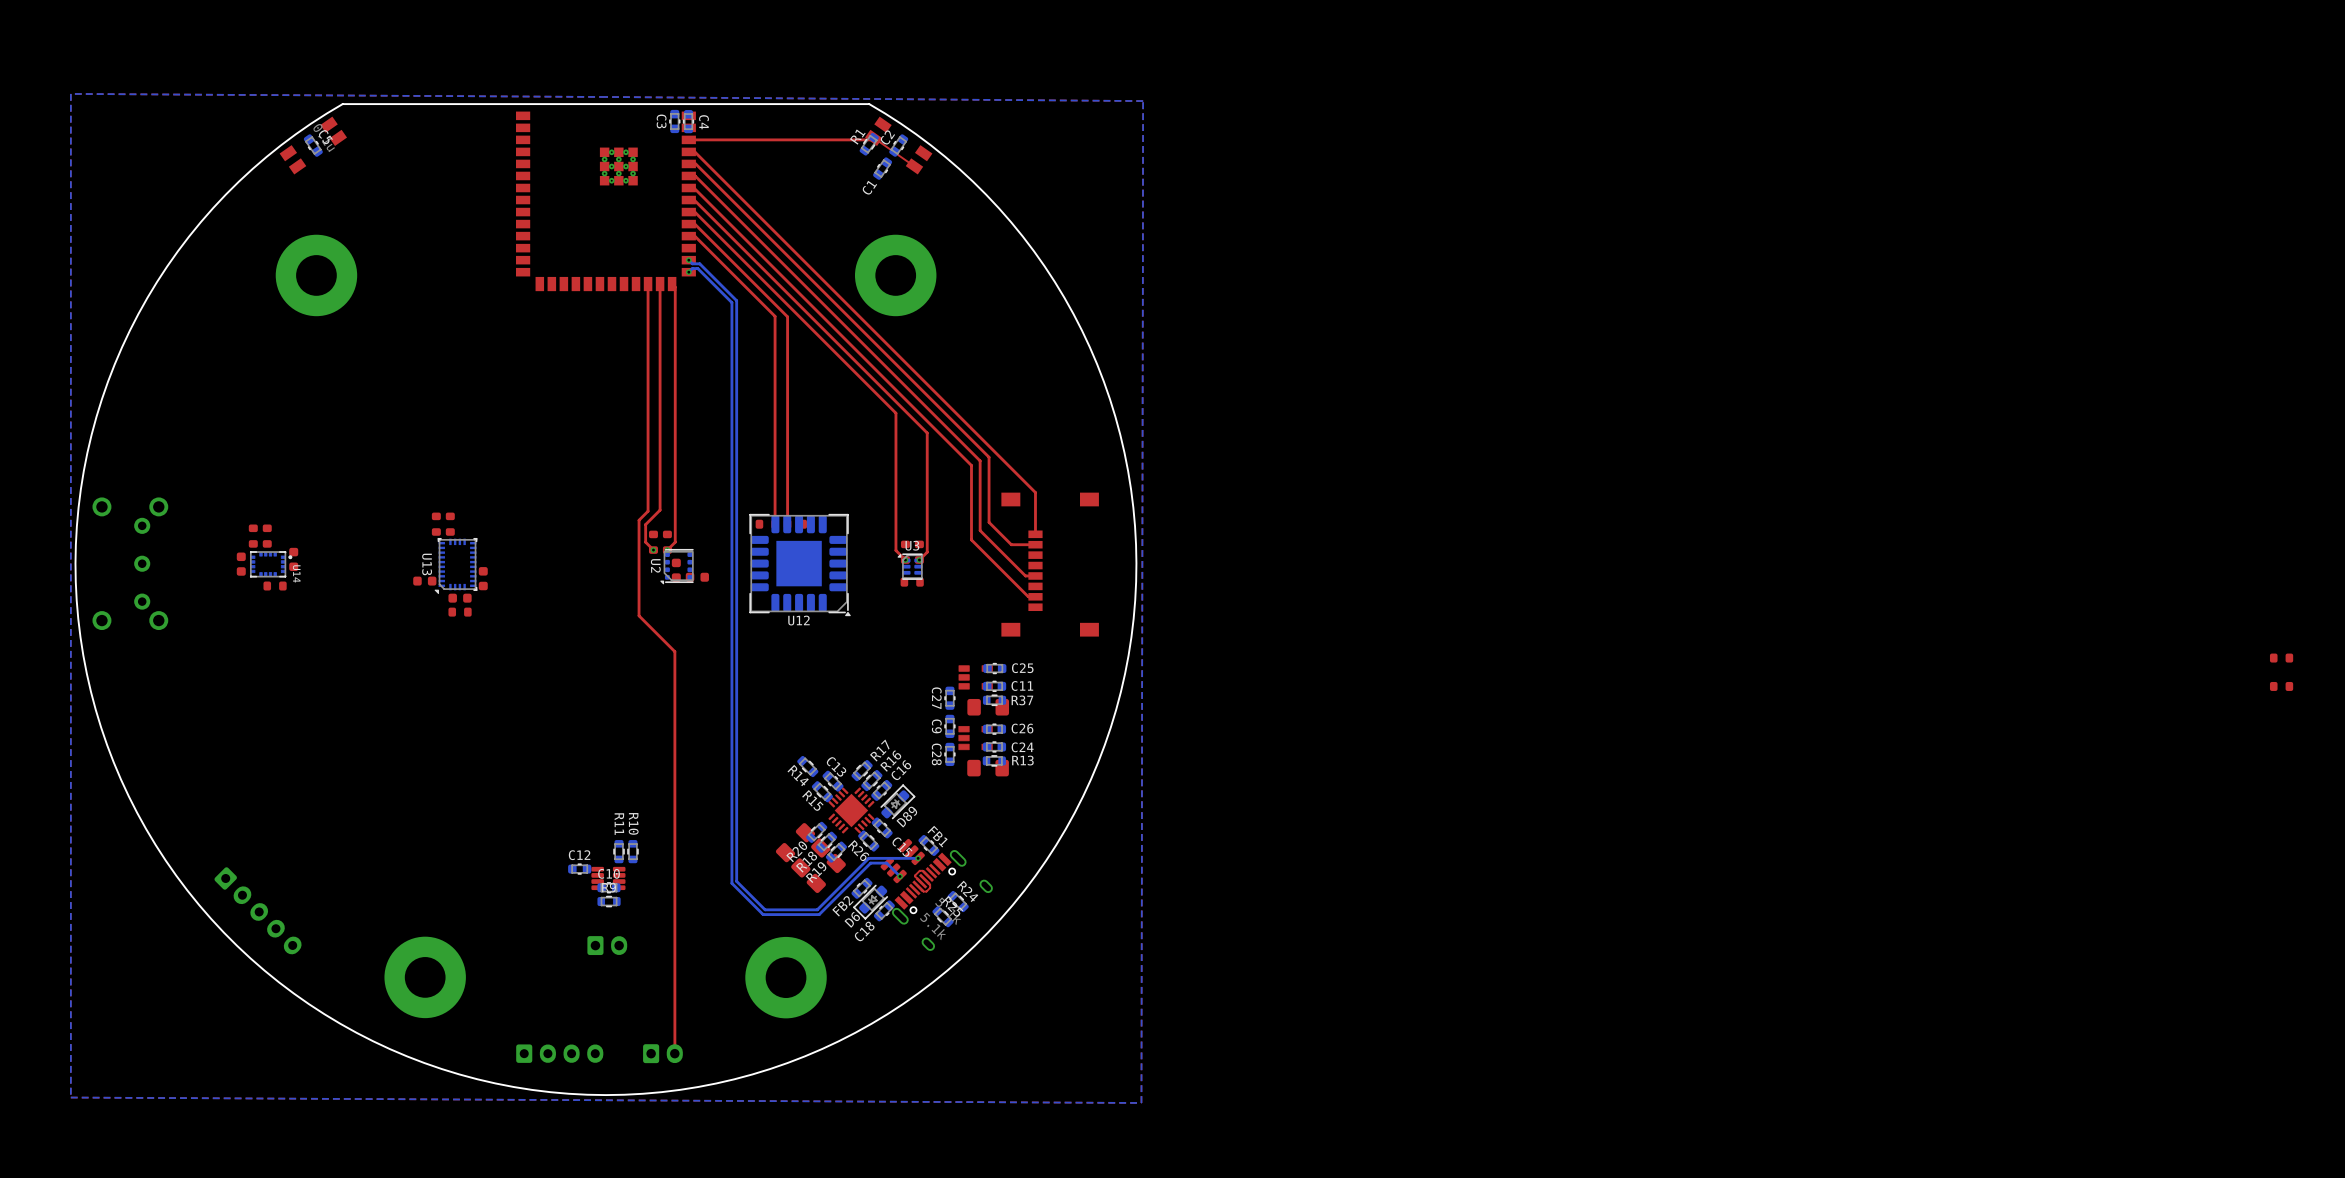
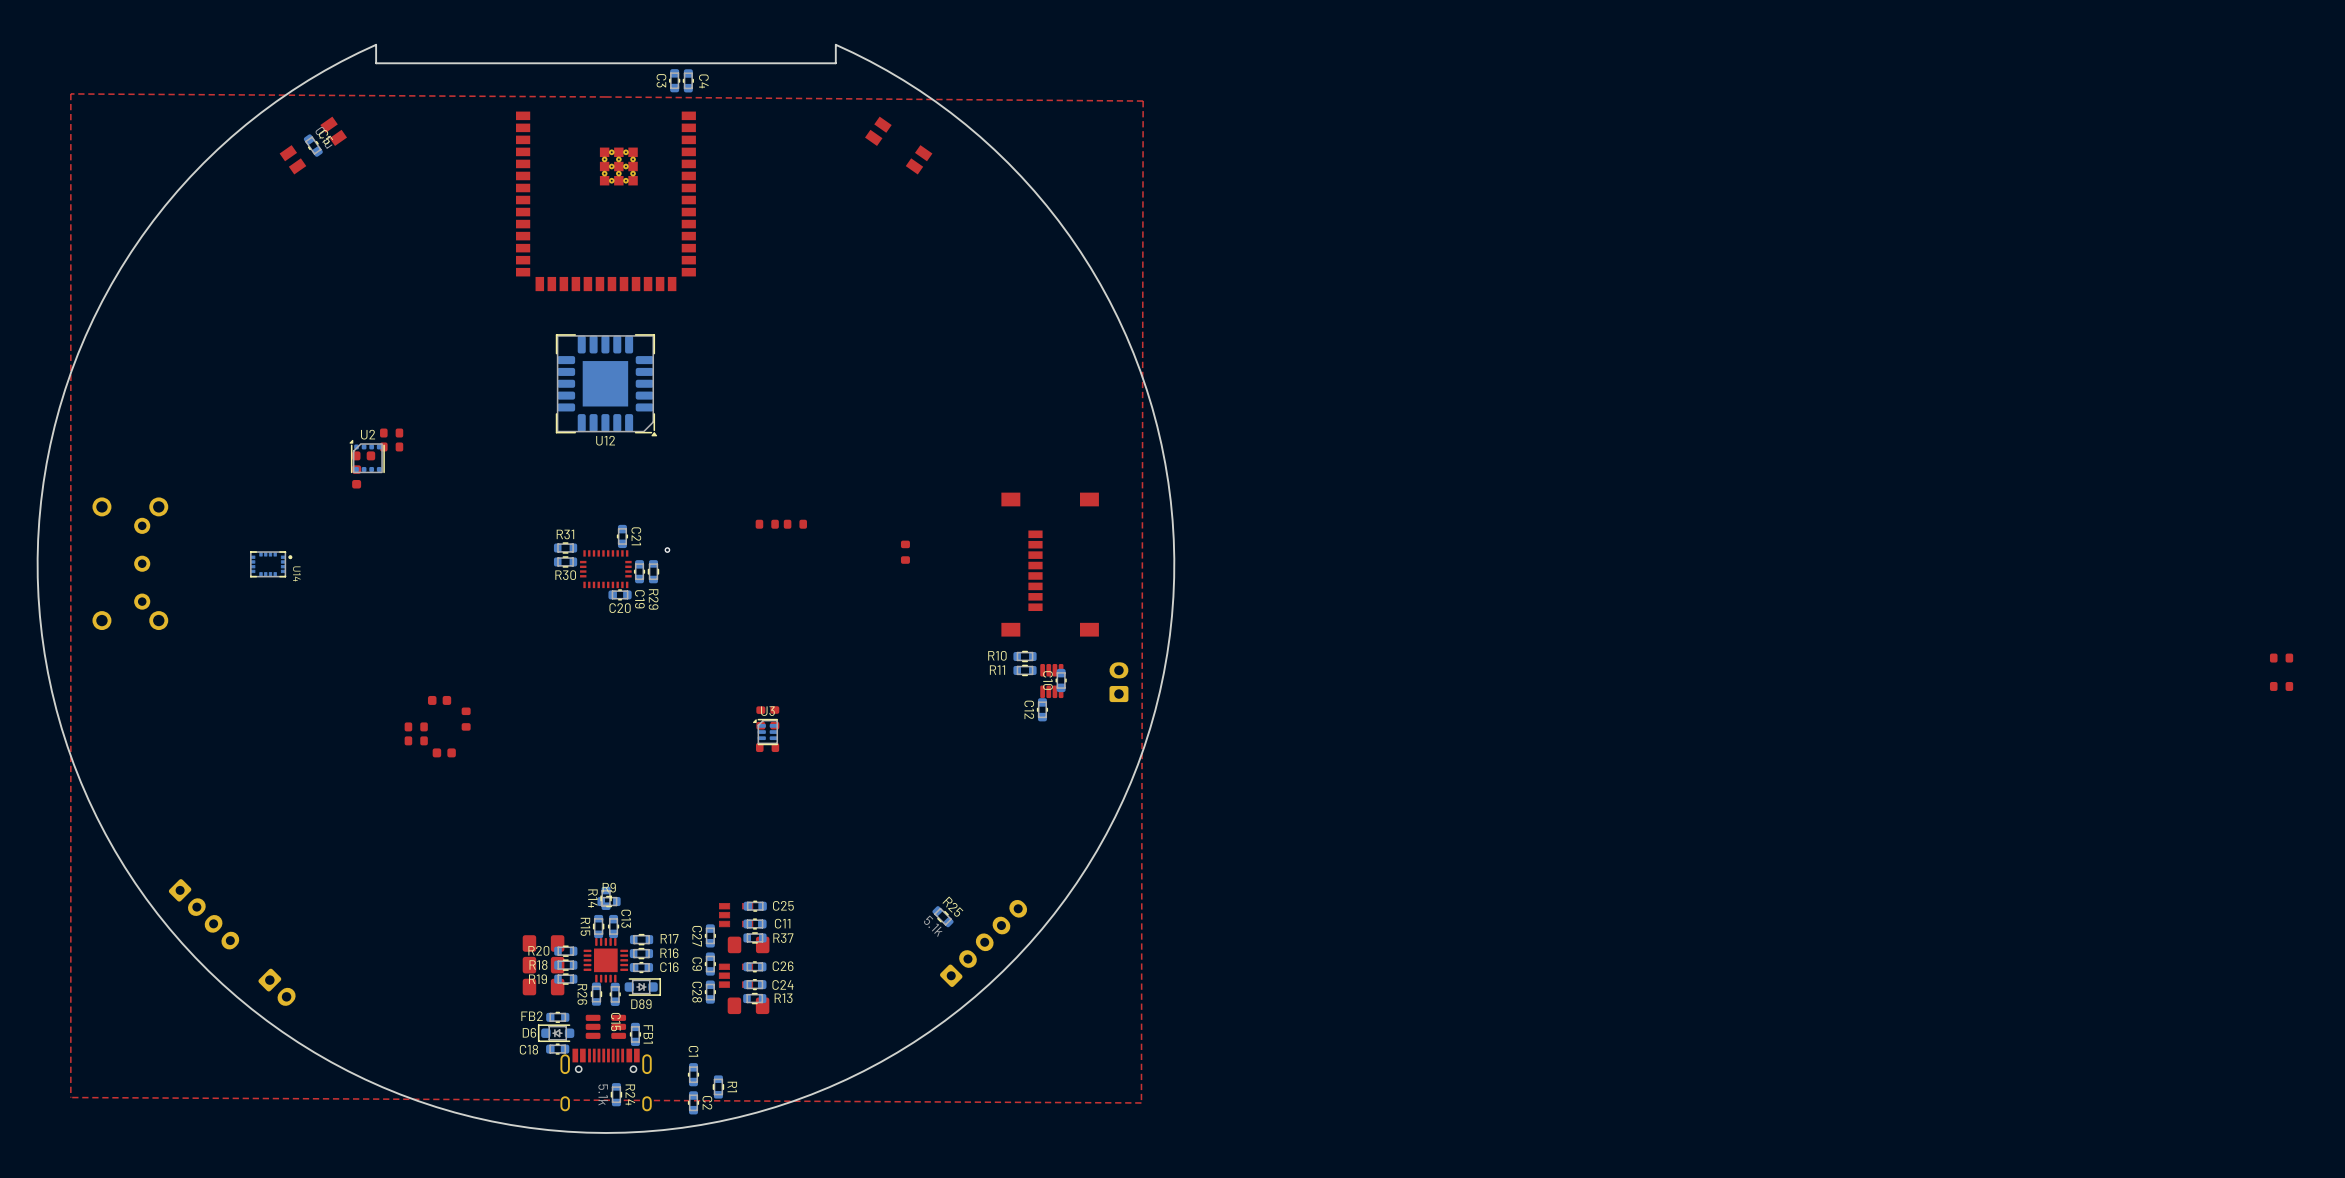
bottom zone outline: (70, 93) (1143, 101) (1141, 1102) (70, 1097) (70, 93) -> none
board edge: (869, 104) (342, 104) (281, 145) (225, 194) (189, 236) (147, 297) (122, 347) (101, 399) (91, 434) (80, 489) (76, 526) (75, 581) (80, 637) (90, 691) (107, 745) (128, 796) (155, 844) (187, 890) (211, 919) (250, 958) (293, 993) (340, 1023) (389, 1049) (441, 1069) (495, 1083) (550, 1092) (605, 1095) (661, 1092) (698, 1086) (752, 1074) (804, 1056) (855, 1032) (903, 1004) (933, 982) (974, 945) (1000, 919) (1035, 875) (1065, 829) (1090, 779) (1110, 727) (1120, 691) (1131, 637) (1136, 581) (1135, 526) (1128, 471) (1120, 434) (1103, 381) (1081, 330) (1064, 297) (1034, 251) (998, 208) (959, 169) (916, 134) (869, 104) -> (835, 44) (887, 70) (935, 101) (980, 136) (1008, 163) (1046, 205) (1080, 251) (1109, 301) (1133, 353) (1152, 407) (1165, 463) (1170, 501) (1174, 558) (1172, 615) (1163, 672) (1150, 728) (1130, 782) (1106, 834) (1076, 883) (1054, 914) (1016, 957) (974, 996) (929, 1031) (880, 1062) (829, 1087) (775, 1107) (719, 1121) (663, 1130) (605, 1132) (548, 1130) (492, 1121) (436, 1107) (382, 1087) (331, 1062) (282, 1031) (236, 996) (208, 971) (169, 929) (135, 883) (105, 834) (80, 782) (61, 728) (47, 672) (39, 615) (37, 558) (41, 501) (50, 444) (65, 389) (85, 335) (111, 284) (131, 251) (165, 205) (203, 163) (231, 136) (276, 101) (324, 70) (376, 44) (376, 63) (835, 63) (835, 44)
C3 position: (674, 121) -> (674, 80)
C4 position: (688, 121) -> (688, 80)
R1 name position: R1 (857, 137) -> R1 (732, 1086)
C2 name position: C2 (887, 137) -> C2 (707, 1102)
top track: (688, 139) (871, 139) (873, 137) (914, 166) -> none
R1 rotation: 0° (869, 144) -> 35° counterclockwise (718, 1086)
R1 position: (869, 144) -> (718, 1086)
C2 rotation: 0° (898, 145) -> 35° counterclockwise (693, 1102)
C2 position: (898, 145) -> (693, 1102)
top track: (688, 151) (694, 151) (1035, 492) (1035, 534) -> none
top track: (688, 163) (695, 163) (989, 457) (989, 522) (1011, 544) (1035, 544) -> none
C1 rotation: 0° (882, 168) -> 35° counterclockwise (693, 1074)
C1 position: (882, 168) -> (693, 1074)
top track: (688, 175) (695, 175) (980, 460) (980, 530) (1025, 575) (1035, 575) -> none
C1 name position: C1 (869, 187) -> C1 (693, 1051)
top track: (688, 188) (694, 188) (971, 465) (971, 539) (1028, 596) (1035, 596) -> none
top track: (688, 200) (694, 200) (927, 433) (927, 552) (919, 560) -> none
top track: (688, 212) (694, 212) (895, 413) (895, 550) (905, 560) -> none
top track: (688, 224) (694, 224) (787, 316) (787, 524) -> none
top track: (688, 236) (694, 236) (775, 316) (775, 524) -> none
bottom track: (688, 260) (692, 263) (699, 263) (736, 300) (736, 881) (765, 909) (817, 909) (868, 858) (918, 858) -> none
via: (688, 260) -> none
bottom track: (688, 272) (692, 268) (697, 268) (731, 302) (731, 883) (763, 914) (819, 914) (870, 863) (886, 863) (900, 876) -> none
via: (688, 272) -> none
part: (316, 275) -> none
part: (895, 275) -> none
top track: (648, 284) (648, 511) (639, 520) (639, 615) (674, 651) (674, 1053) -> none
top track: (660, 284) (660, 510) (645, 524) (645, 542) (653, 550) -> none
top track: (672, 284) (675, 287) (675, 542) (667, 550) -> none
part: none -> (391, 433)
part: none -> (391, 446)
part: none -> (363, 455)
part: none -> (356, 476)
R31 side: top (436, 524) -> bottom (565, 548)
R30 side: top (450, 524) -> bottom (565, 561)
part: (253, 536) -> none
part: (267, 536) -> none
part: (653, 542) -> none
part: (667, 542) -> none
via: (653, 550) -> none
part: (919, 552) -> none
part: (293, 559) -> none
via: (905, 560) -> none
via: (919, 560) -> none
part: (241, 564) -> none
U12 position: (800, 565) -> (606, 385)
U13 side: bottom (455, 566) -> top (605, 569)
U2 rotation: 0° (676, 566) -> 90° clockwise (367, 456)
U2 position: (676, 566) -> (367, 456)
U3 position: (910, 566) -> (765, 732)
part: (676, 570) -> none
part: (697, 577) -> none
C20 side: top (483, 578) -> bottom (620, 594)
C21 side: top (424, 581) -> bottom (622, 536)
part: (912, 582) -> none
part: (275, 586) -> none
C19 side: top (460, 598) -> bottom (639, 571)
R29 side: top (460, 612) -> bottom (653, 571)
C25 position: (994, 668) -> (755, 906)
part: (975, 677) -> none
part: none -> (1051, 681)
part: none -> (1118, 682)
C11 position: (994, 686) -> (754, 924)
C27 position: (949, 698) -> (710, 935)
part: none -> (439, 700)
R37 position: (994, 700) -> (754, 937)
part: (988, 707) -> none
part: none -> (760, 717)
part: none -> (774, 717)
part: none -> (466, 719)
part: none -> (416, 726)
C9 position: (949, 726) -> (710, 964)
C26 position: (994, 729) -> (754, 966)
part: (975, 738) -> none
part: none -> (416, 740)
C24 position: (994, 746) -> (754, 984)
part: none -> (767, 747)
part: none -> (444, 752)
C28 position: (949, 754) -> (710, 992)
R13 position: (994, 760) -> (754, 998)
R14 rotation: 0° (807, 766) -> 45° clockwise (606, 898)
R14 position: (807, 766) -> (606, 898)
part: (988, 768) -> none
R17 rotation: 0° (862, 770) -> 45° clockwise (641, 939)
R17 position: (862, 770) -> (641, 939)
R16 rotation: 0° (871, 780) -> 45° clockwise (641, 953)
R16 position: (871, 780) -> (641, 953)
C13 rotation: 0° (833, 781) -> 45° clockwise (613, 926)
C13 position: (833, 781) -> (613, 926)
C16 rotation: 0° (881, 790) -> 45° clockwise (641, 967)
C16 position: (881, 790) -> (641, 967)
R15 rotation: 0° (822, 791) -> 45° clockwise (598, 926)
R15 position: (822, 791) -> (598, 926)
D89 rotation: 0° (897, 801) -> 45° clockwise (642, 987)
D89 position: (897, 801) -> (642, 987)
part: (851, 810) -> none
R10 name position: R10 (633, 823) -> R10 (997, 655)
R11 name position: R11 (619, 824) -> R11 (997, 670)
C15 rotation: 0° (882, 827) -> 45° clockwise (615, 994)
C15 position: (882, 827) -> (615, 994)
R20 rotation: 0° (816, 832) -> 45° clockwise (565, 951)
R20 position: (816, 832) -> (565, 951)
R26 rotation: 0° (868, 841) -> 45° clockwise (596, 994)
R26 position: (868, 841) -> (596, 994)
part: (795, 842) -> none
R18 rotation: 0° (826, 842) -> 45° clockwise (565, 965)
R18 position: (826, 842) -> (565, 965)
FB1 rotation: 0° (928, 845) -> 45° clockwise (635, 1034)
FB1 position: (928, 845) -> (635, 1034)
R11 rotation: 0° (619, 851) -> 90° clockwise (1025, 670)
R11 position: (619, 851) -> (1025, 670)
R10 rotation: 0° (632, 851) -> 90° clockwise (1025, 656)
R10 position: (632, 851) -> (1025, 656)
R19 rotation: 0° (836, 852) -> 45° clockwise (565, 979)
R19 position: (836, 852) -> (565, 979)
C12 name position: C12 (579, 855) -> C12 (1029, 709)
part: (810, 857) -> none
via: (918, 858) -> none
part: (902, 861) -> none
C12 rotation: 0° (579, 869) -> 90° clockwise (1042, 709)
C12 position: (579, 869) -> (1042, 709)
C10 name position: C10 (609, 873) -> C10 (1047, 680)
part: (826, 873) -> none
via: (900, 876) -> none
top track: (928, 876) (922, 870) (919, 870) (915, 876) (921, 882) -> none
part: (608, 878) -> none
top track: (924, 879) (930, 884) (926, 891) (923, 891) (918, 886) -> none
C10 rotation: 0° (608, 887) -> 90° clockwise (1061, 680)
C10 position: (608, 887) -> (1061, 680)
FB2 rotation: 0° (861, 888) -> 45° clockwise (557, 1017)
FB2 position: (861, 888) -> (557, 1017)
part: (942, 900) -> none
R24 rotation: 0° (958, 901) -> 45° clockwise (616, 1094)
R24 position: (958, 901) -> (616, 1094)
D6 rotation: 0° (870, 902) -> 45° clockwise (556, 1033)
D6 position: (870, 902) -> (556, 1033)
part: (258, 910) -> none
C18 rotation: 0° (884, 910) -> 45° clockwise (557, 1049)
C18 position: (884, 910) -> (557, 1049)
part: none -> (204, 914)
part: none -> (736, 915)
part: none -> (543, 943)
part: none -> (983, 943)
part: none -> (748, 944)
part: (607, 945) -> none
part: none -> (605, 960)
part: none -> (543, 965)
part: none -> (735, 975)
part: (425, 977) -> none
part: (786, 977) -> none
part: none -> (277, 987)
part: none -> (543, 987)
part: none -> (748, 1005)
part: none -> (605, 1026)
part: (559, 1053) -> none
part: (662, 1053) -> none
part: none -> (606, 1080)

